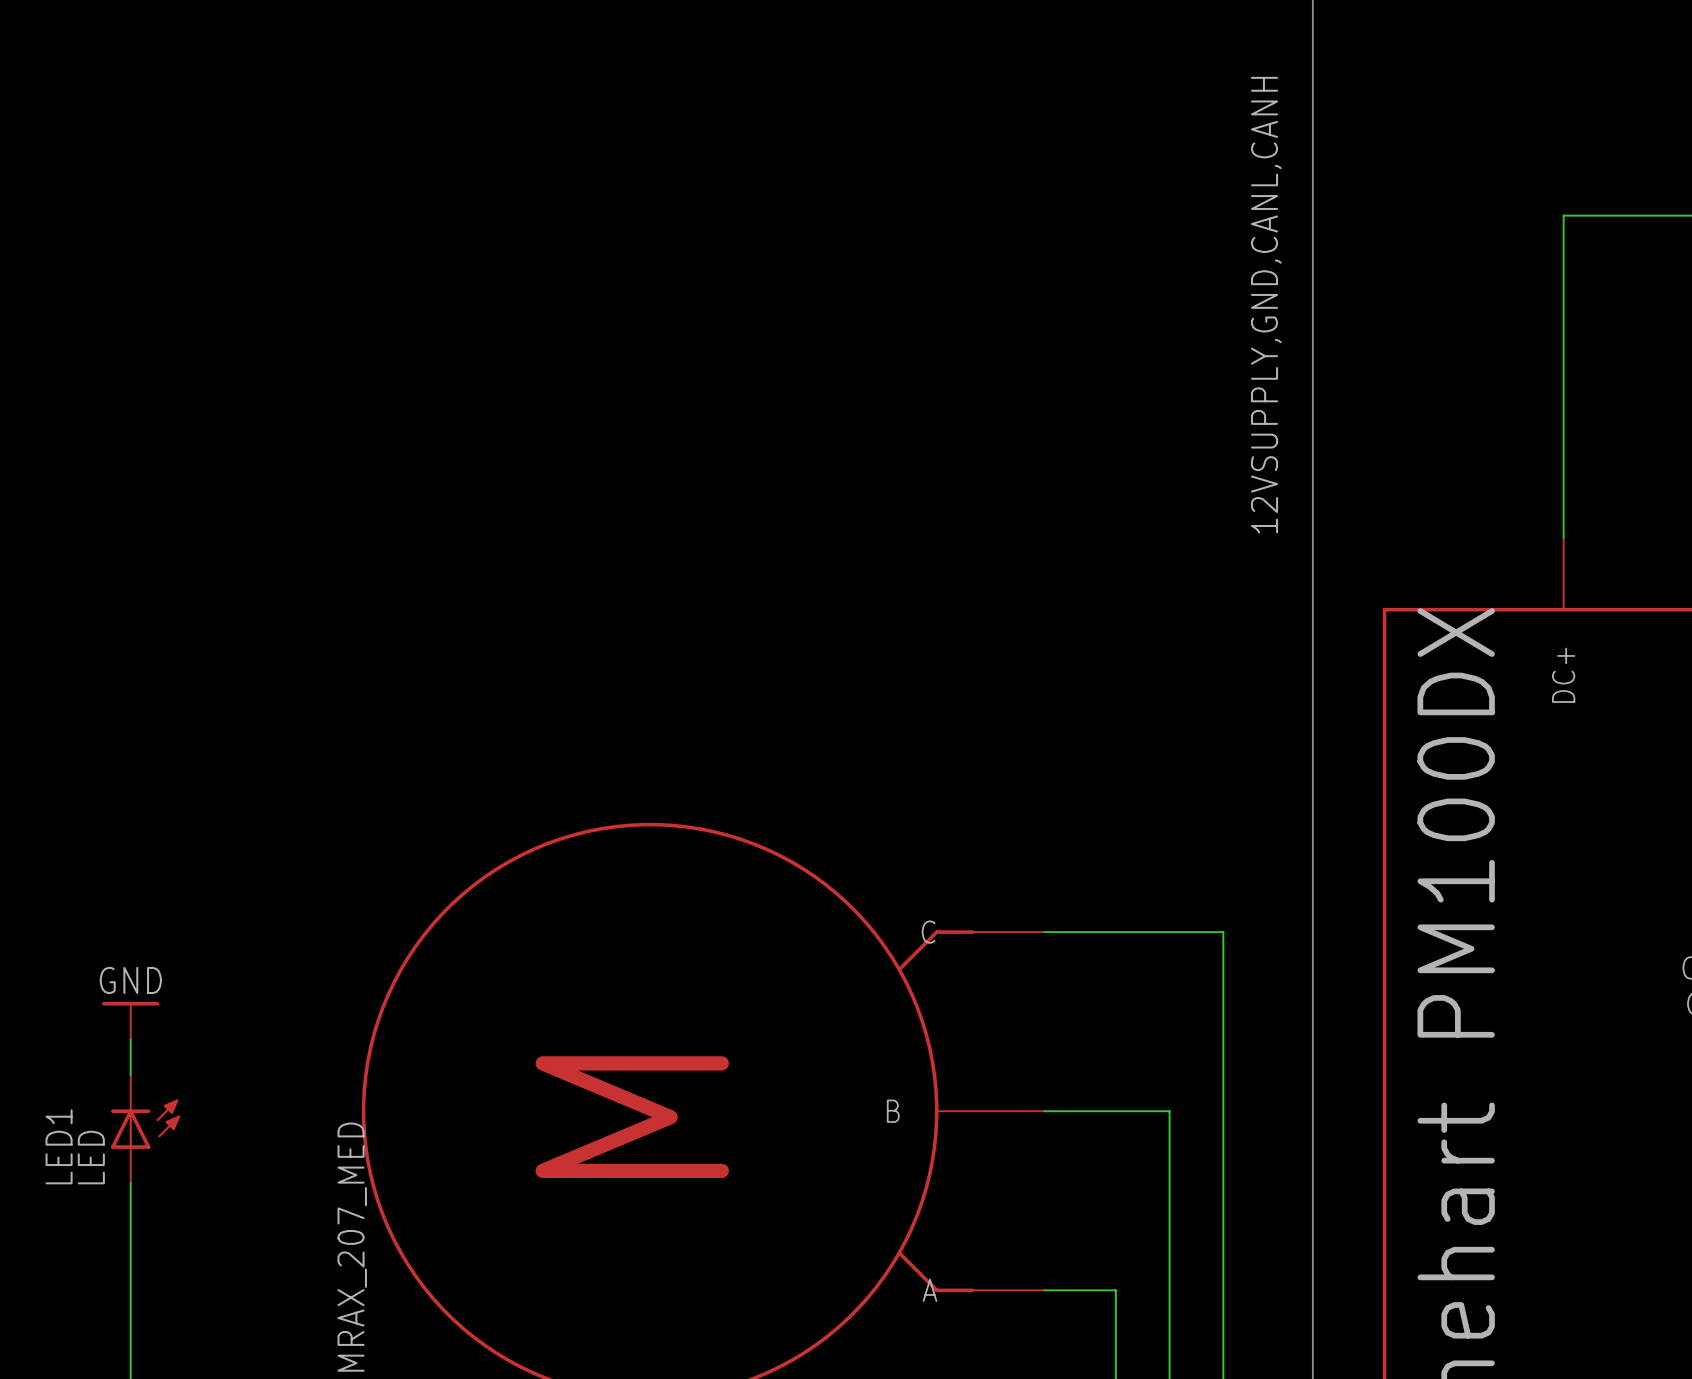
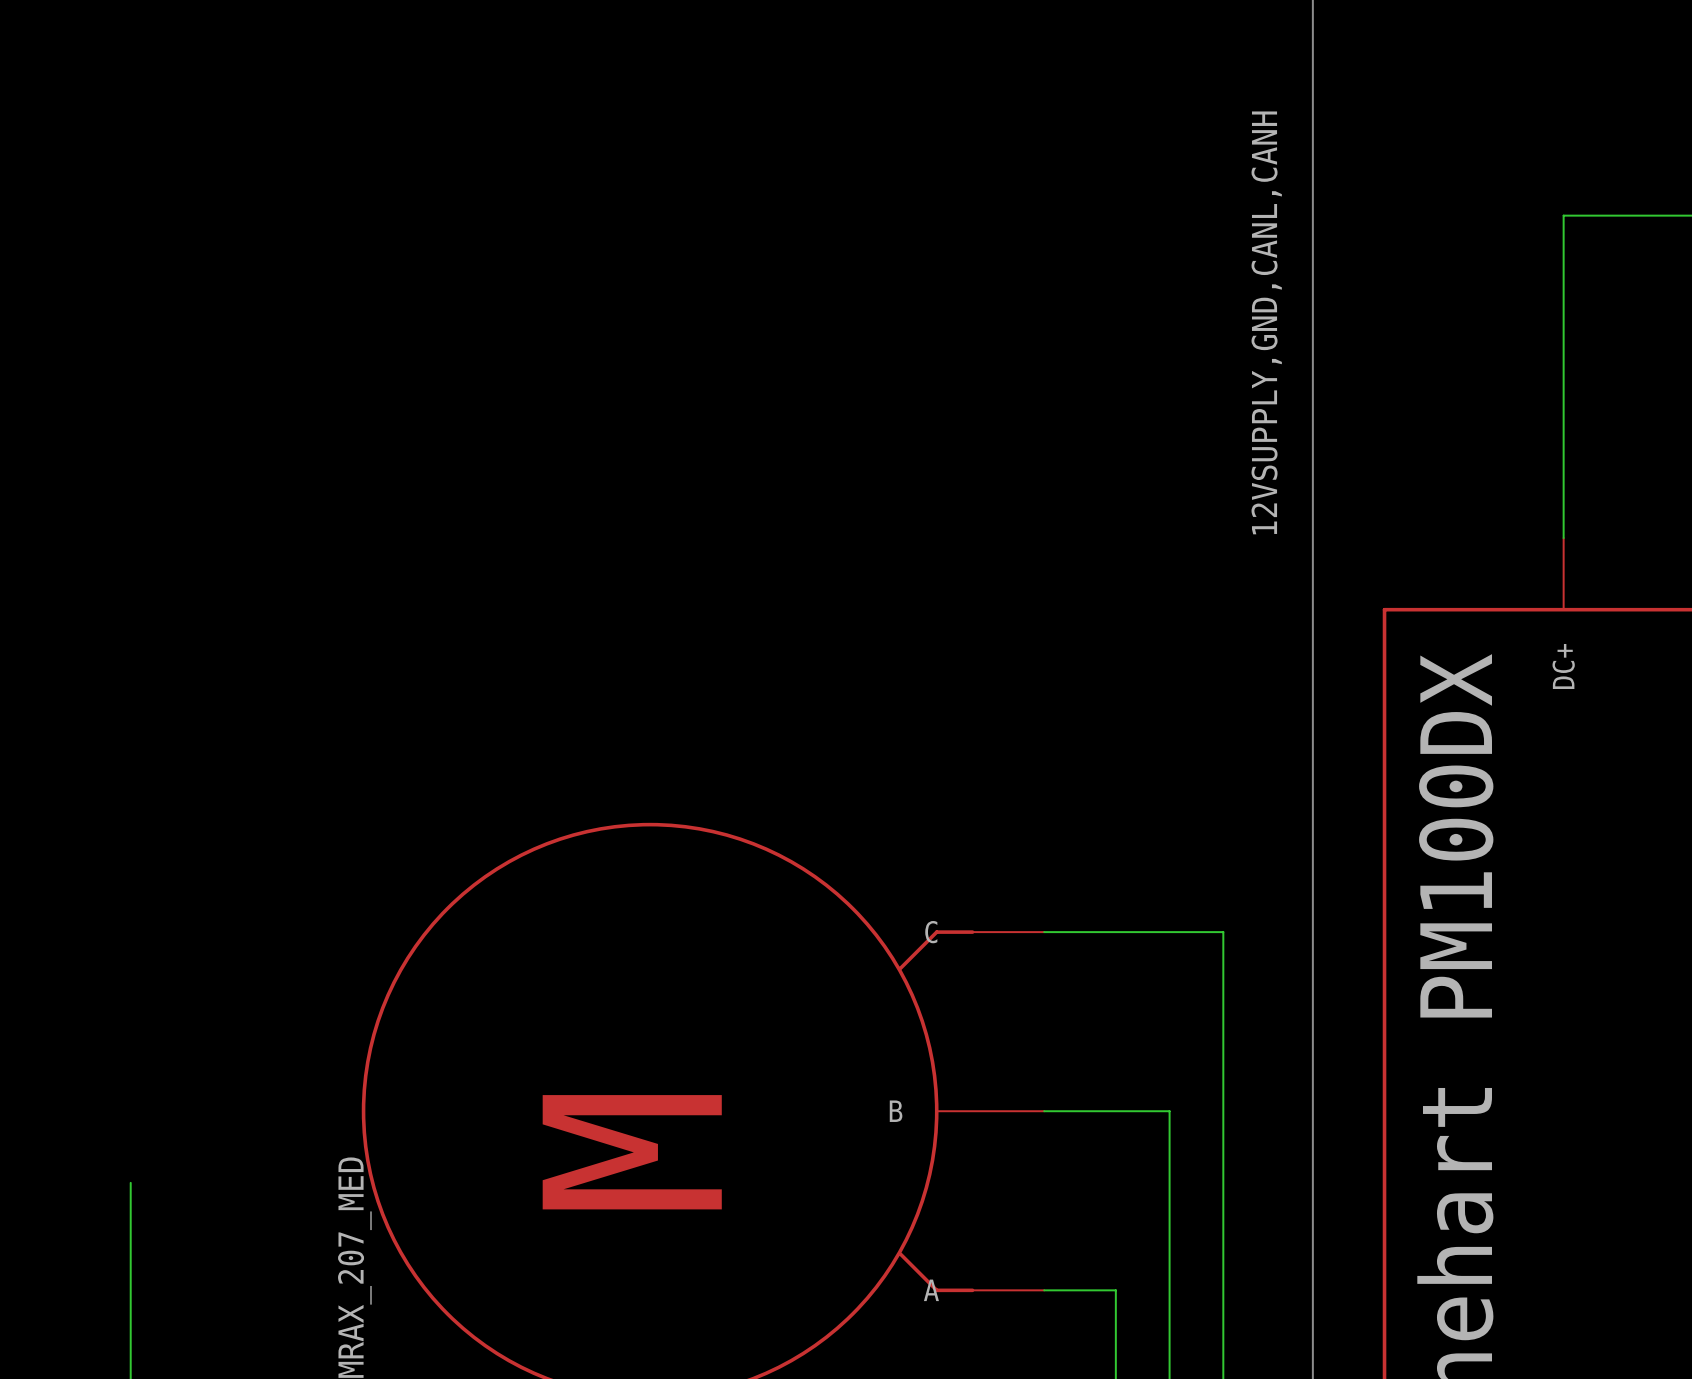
power symbol: GND (130, 1020) -> none
wire: (130, 1039) (130, 1075) -> none
LED1: LED (145, 1129) -> none

